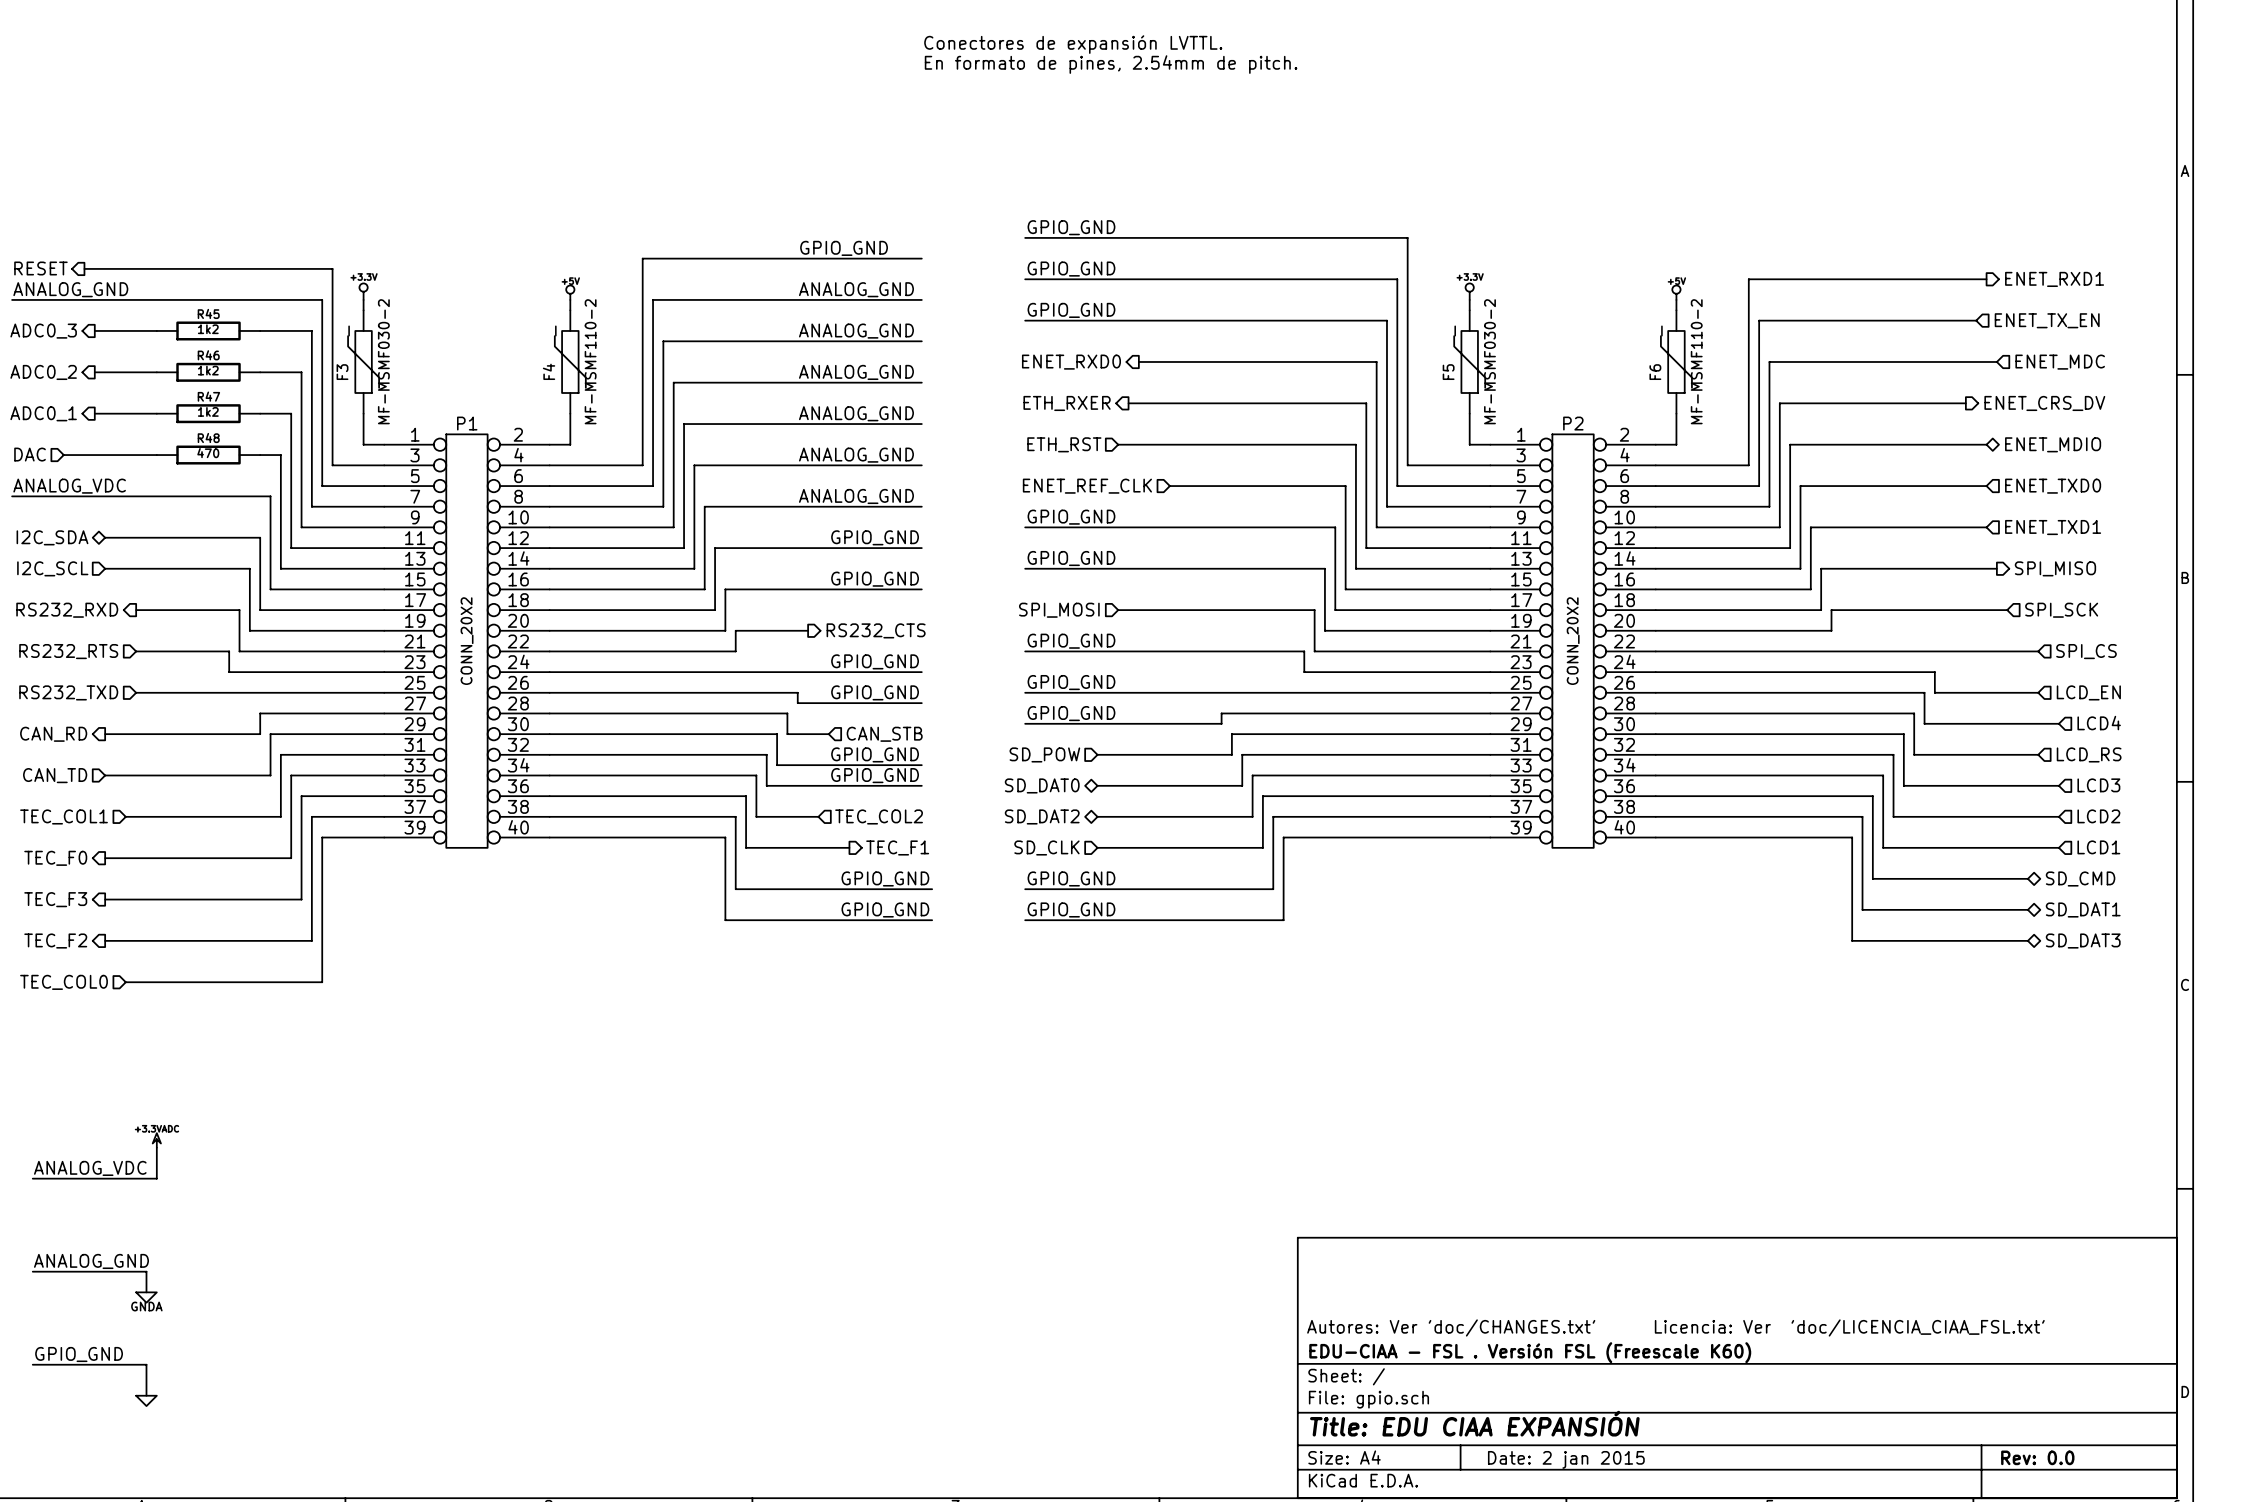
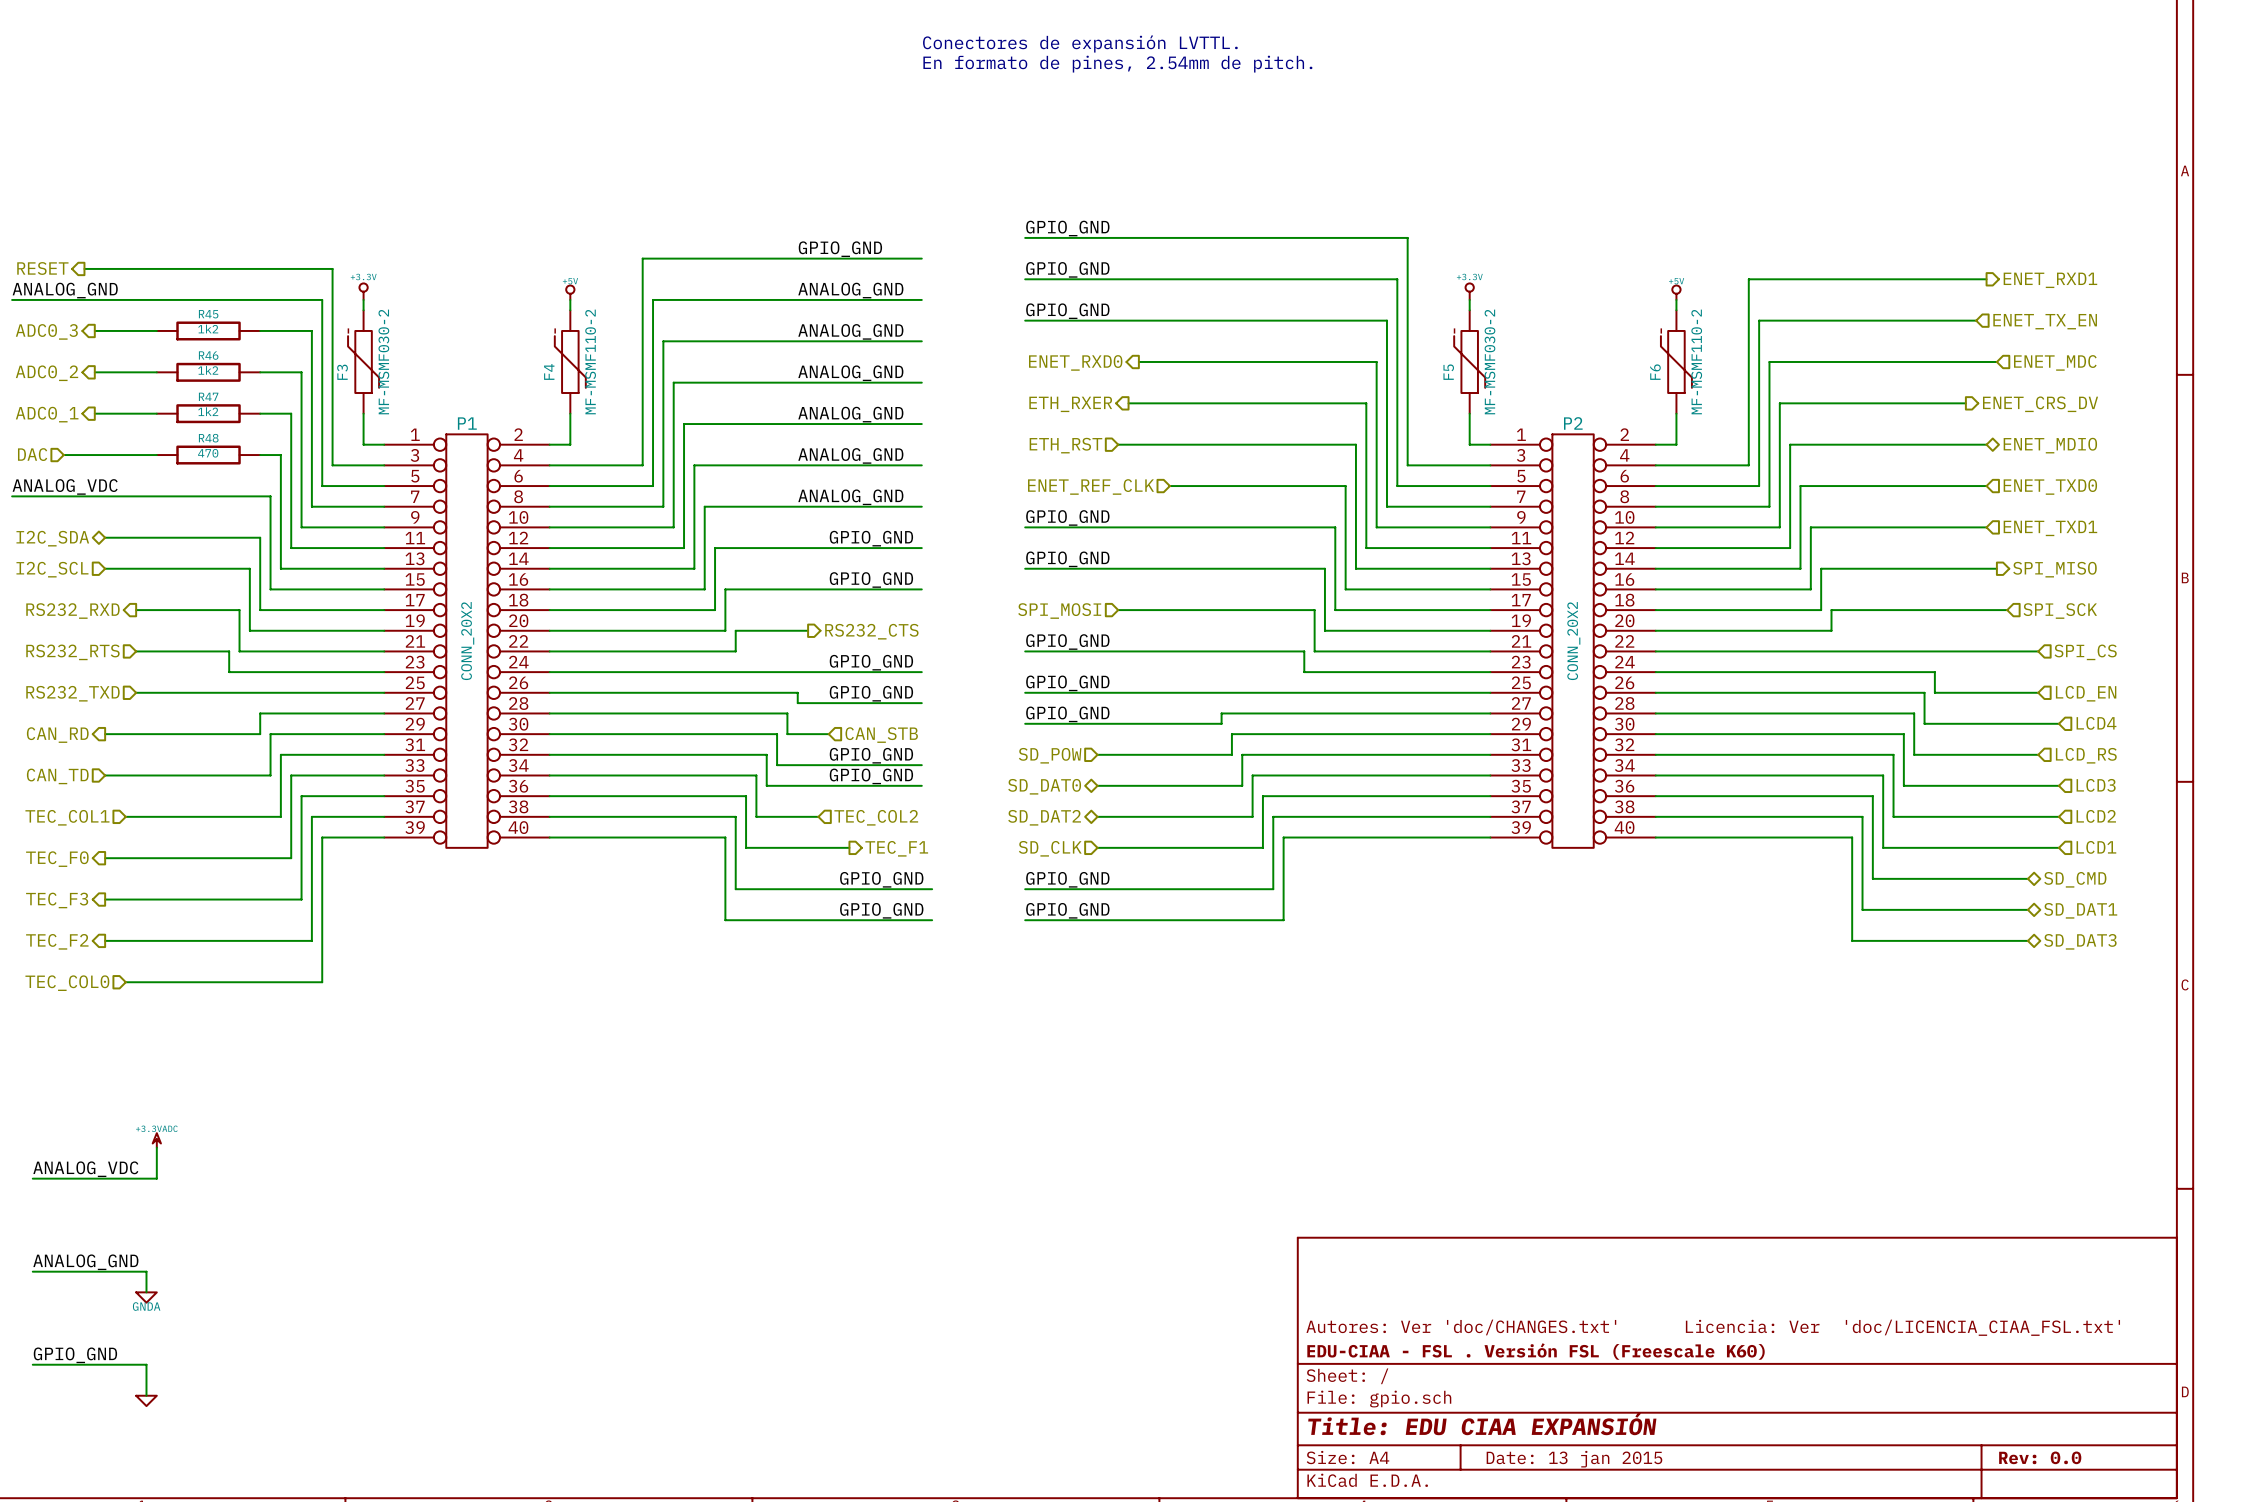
title block: Date: 2 jan 2015 (1566, 1459) -> Date: 13 jan 2015 (1574, 1459)

